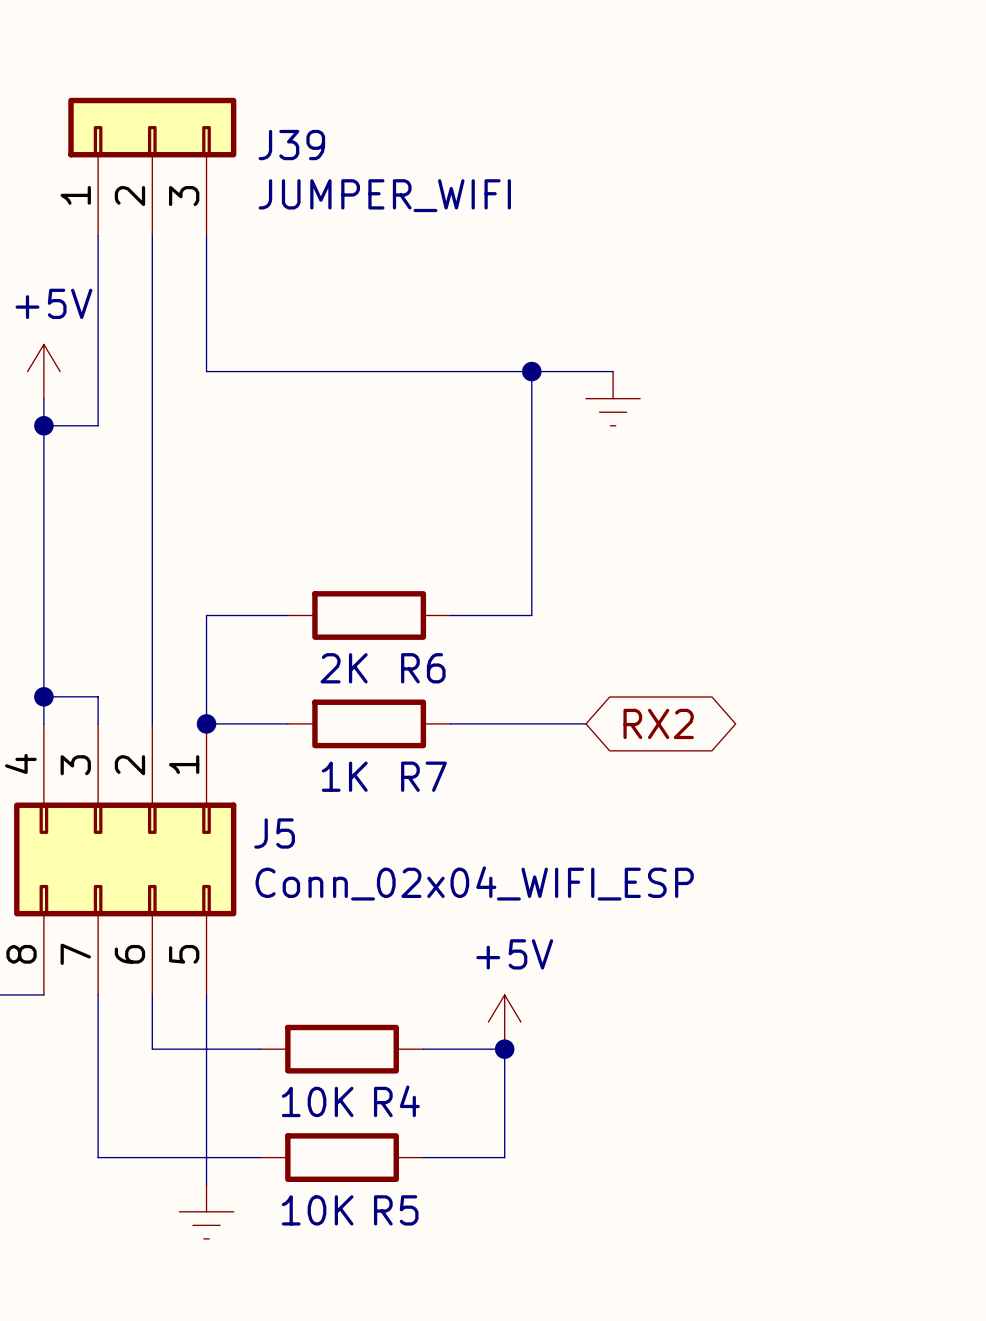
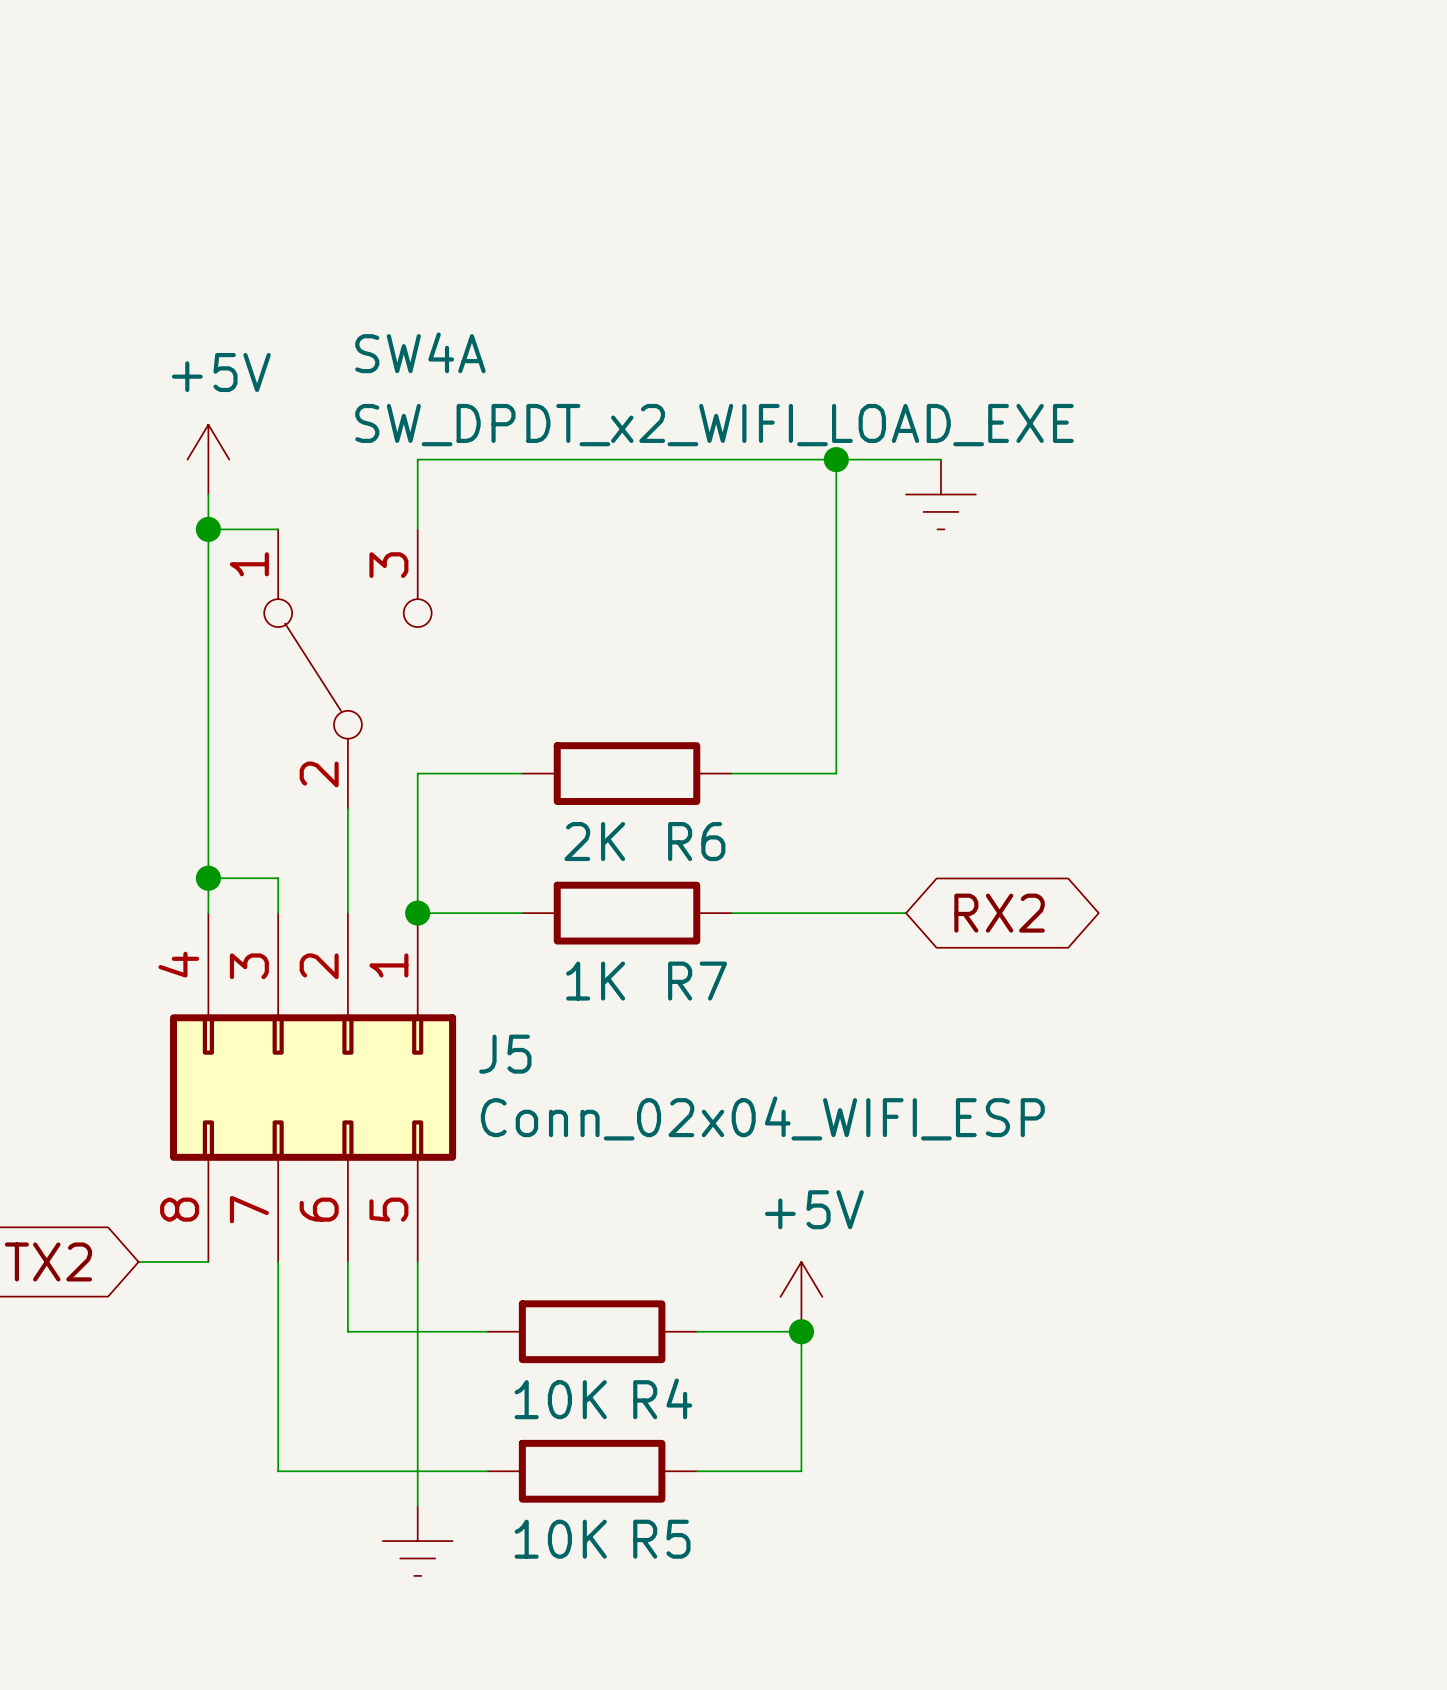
J39: JUMPER_WIFI (152, 166) -> none
wire: (98, 236) (98, 425) -> none
wire: (152, 236) (152, 642) -> none
wire: (206, 236) (206, 371) -> (417, 529) (417, 459)
SW4A: none -> SW_DPDT_x2_WIFI_LOAD_EXE (347, 668)

